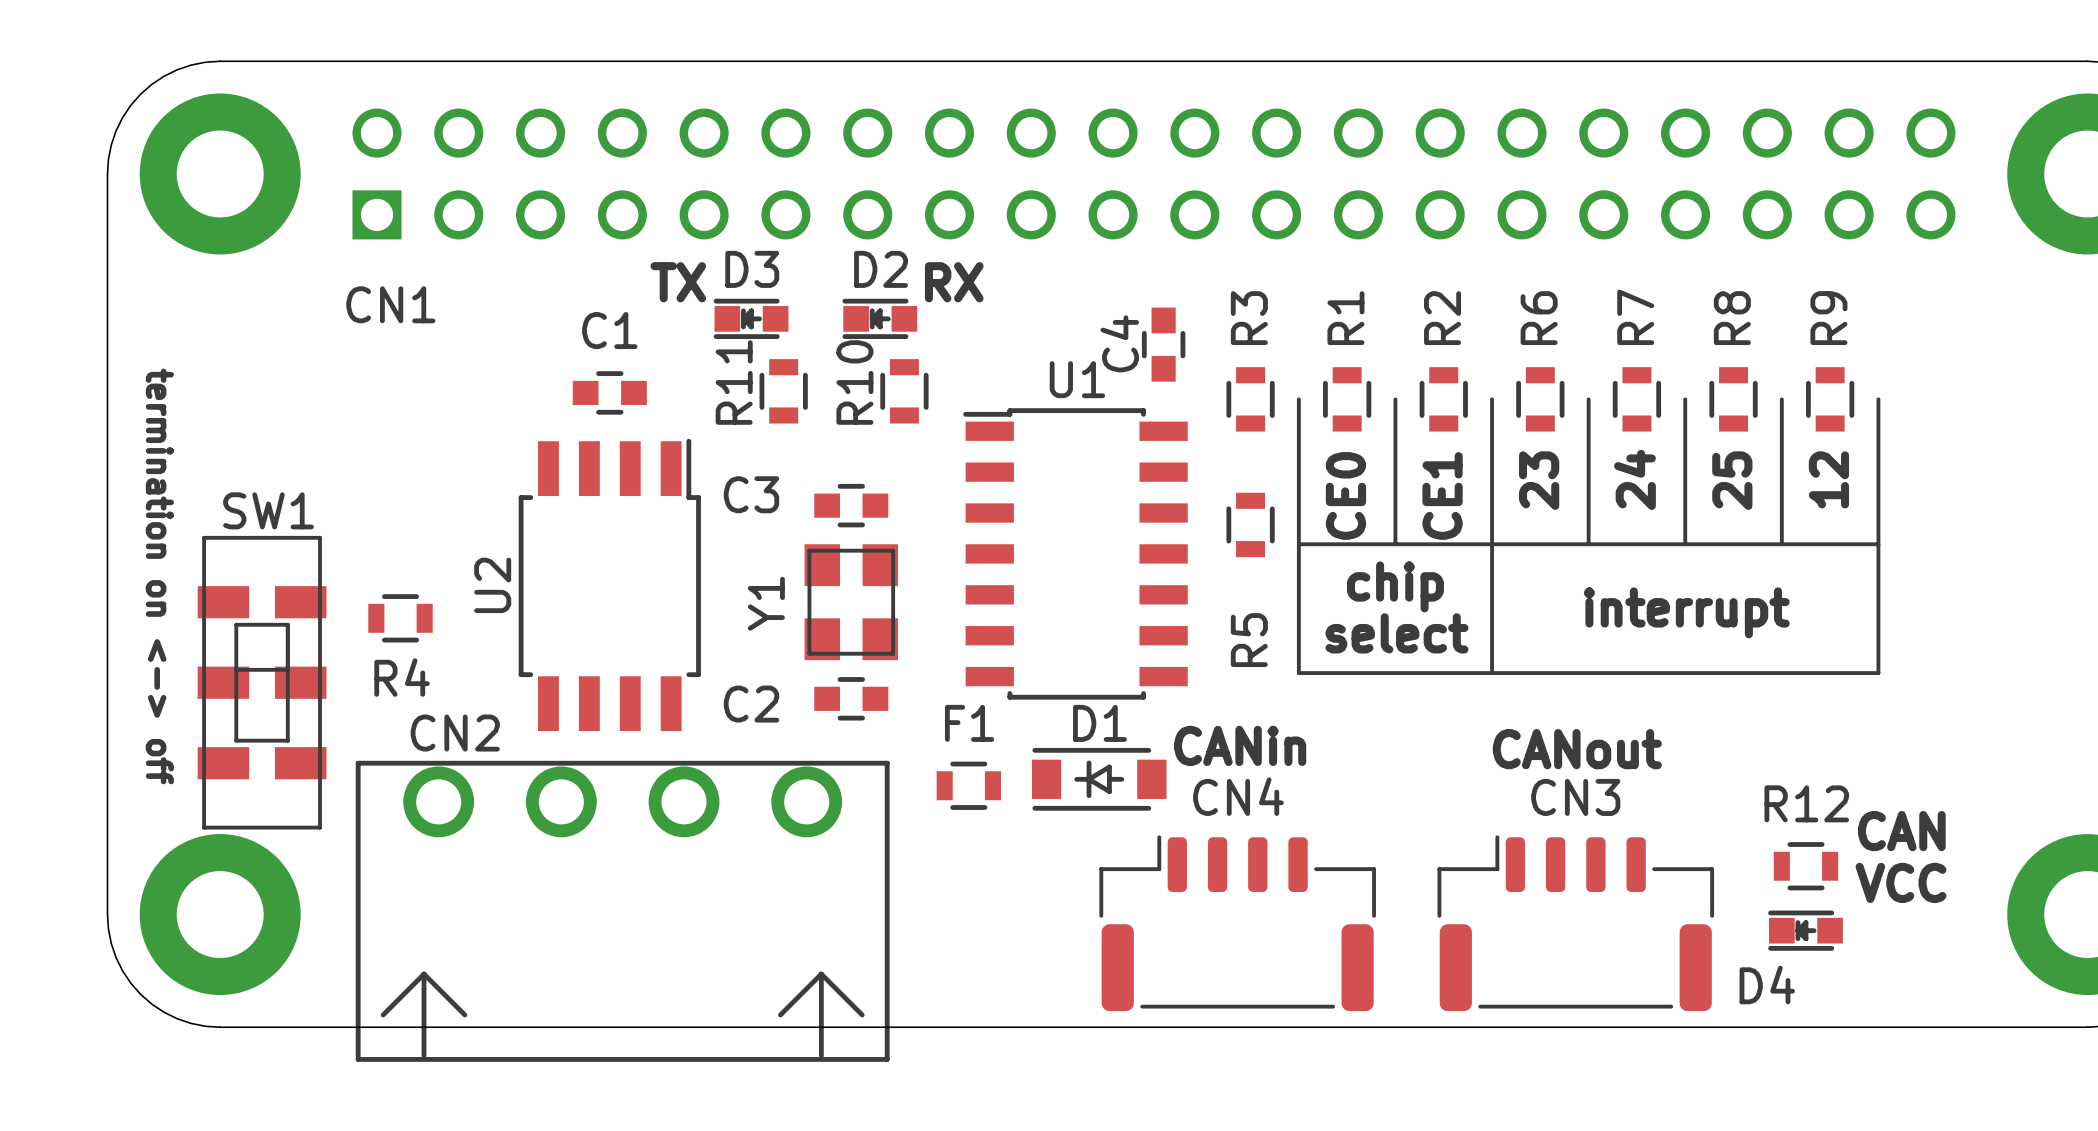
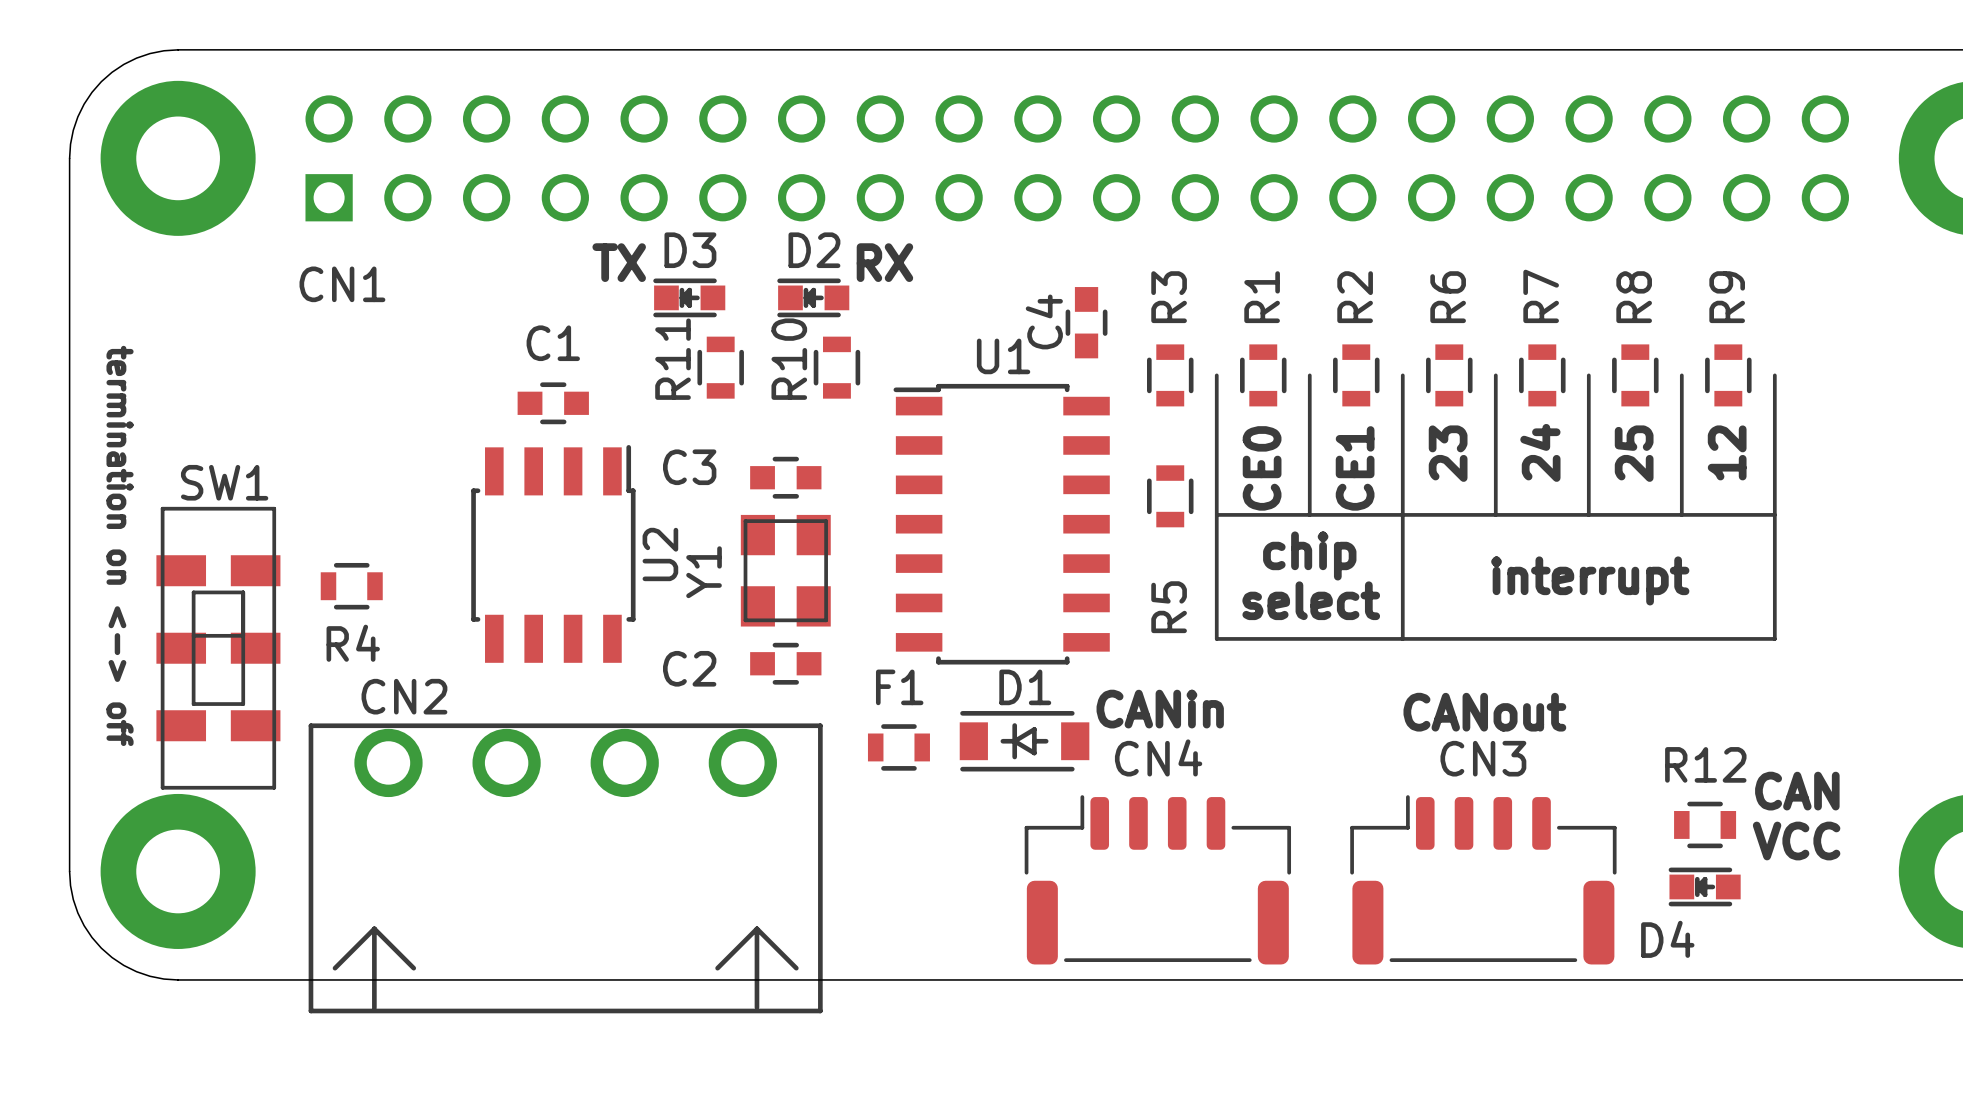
C1 position: (609, 392) -> (553, 403)
U2 footprint: [518, 438, 701, 732] -> [471, 445, 636, 663]
U2 name position: U2 (492, 585) -> U2 (660, 554)

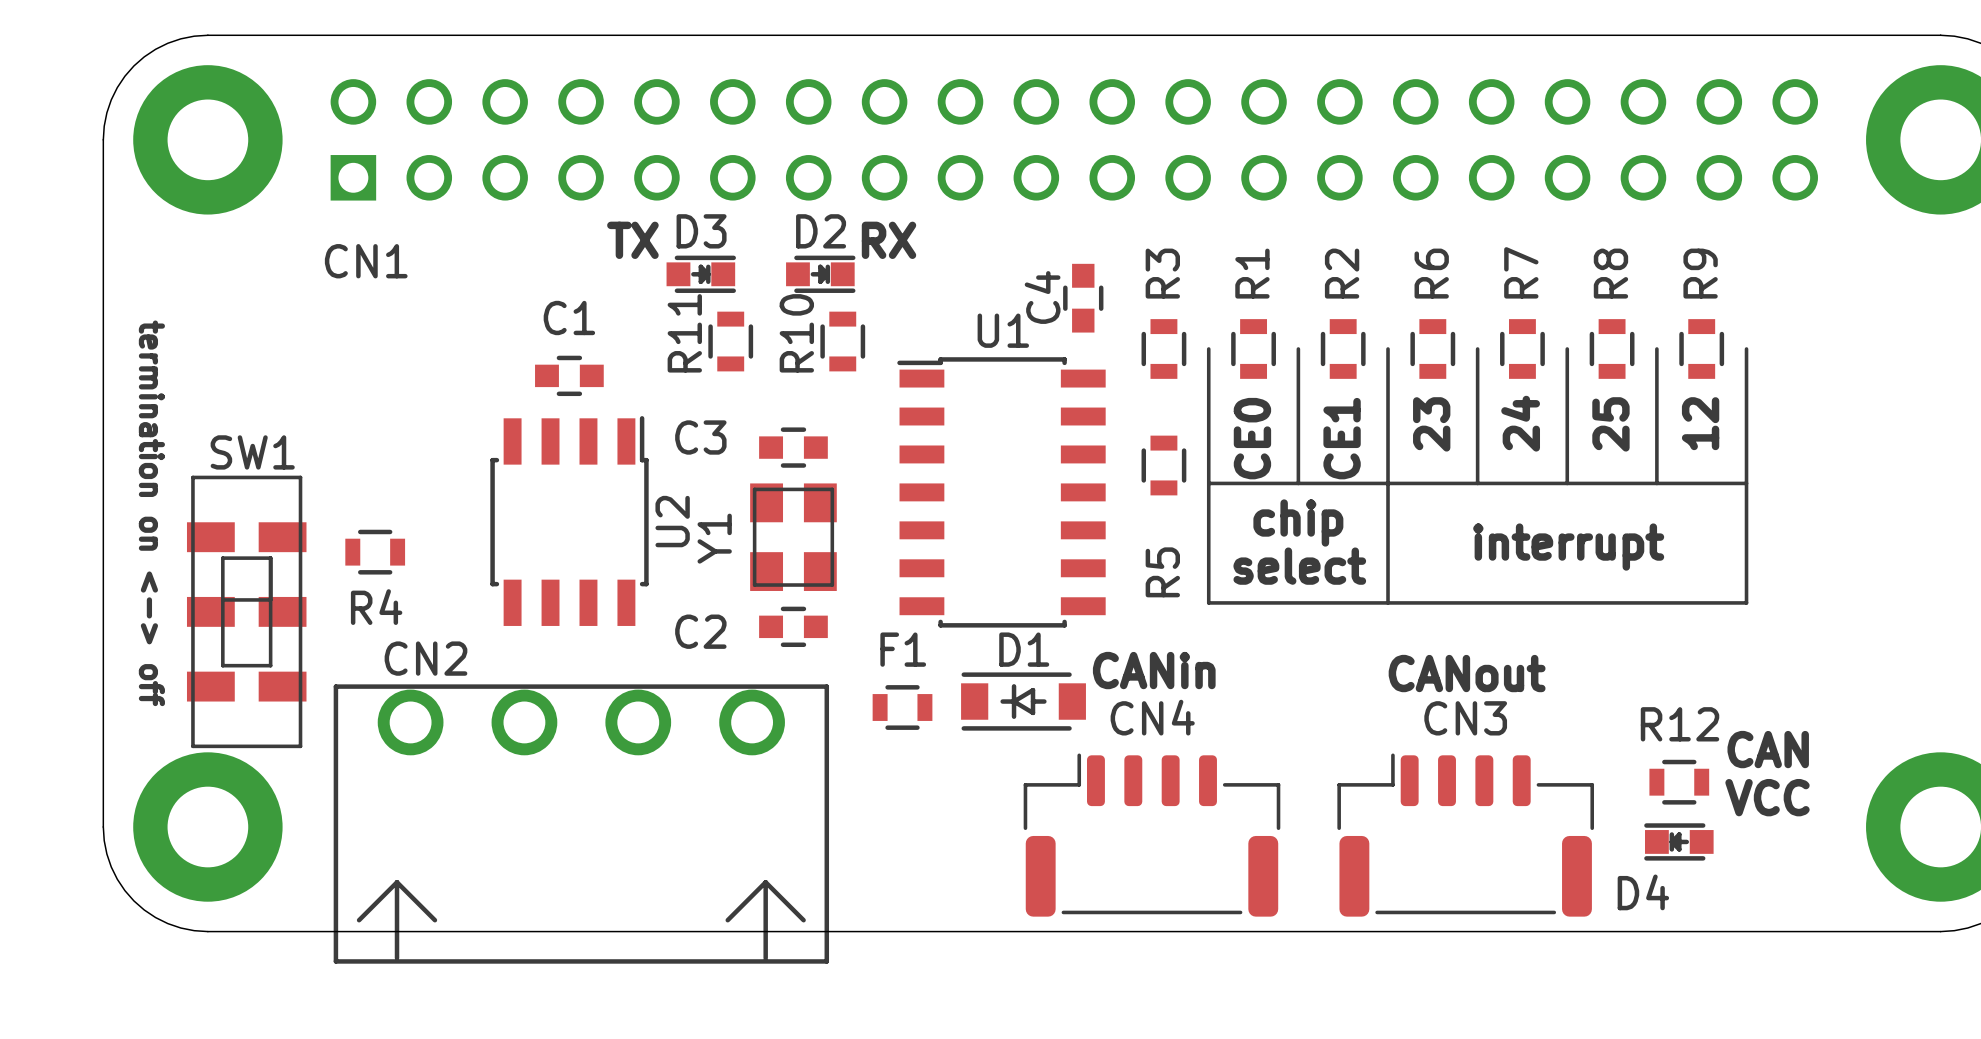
D3 rotation: 0° (689, 297) -> 180° (701, 274)
D2 rotation: 0° (813, 297) -> 180° (820, 274)

